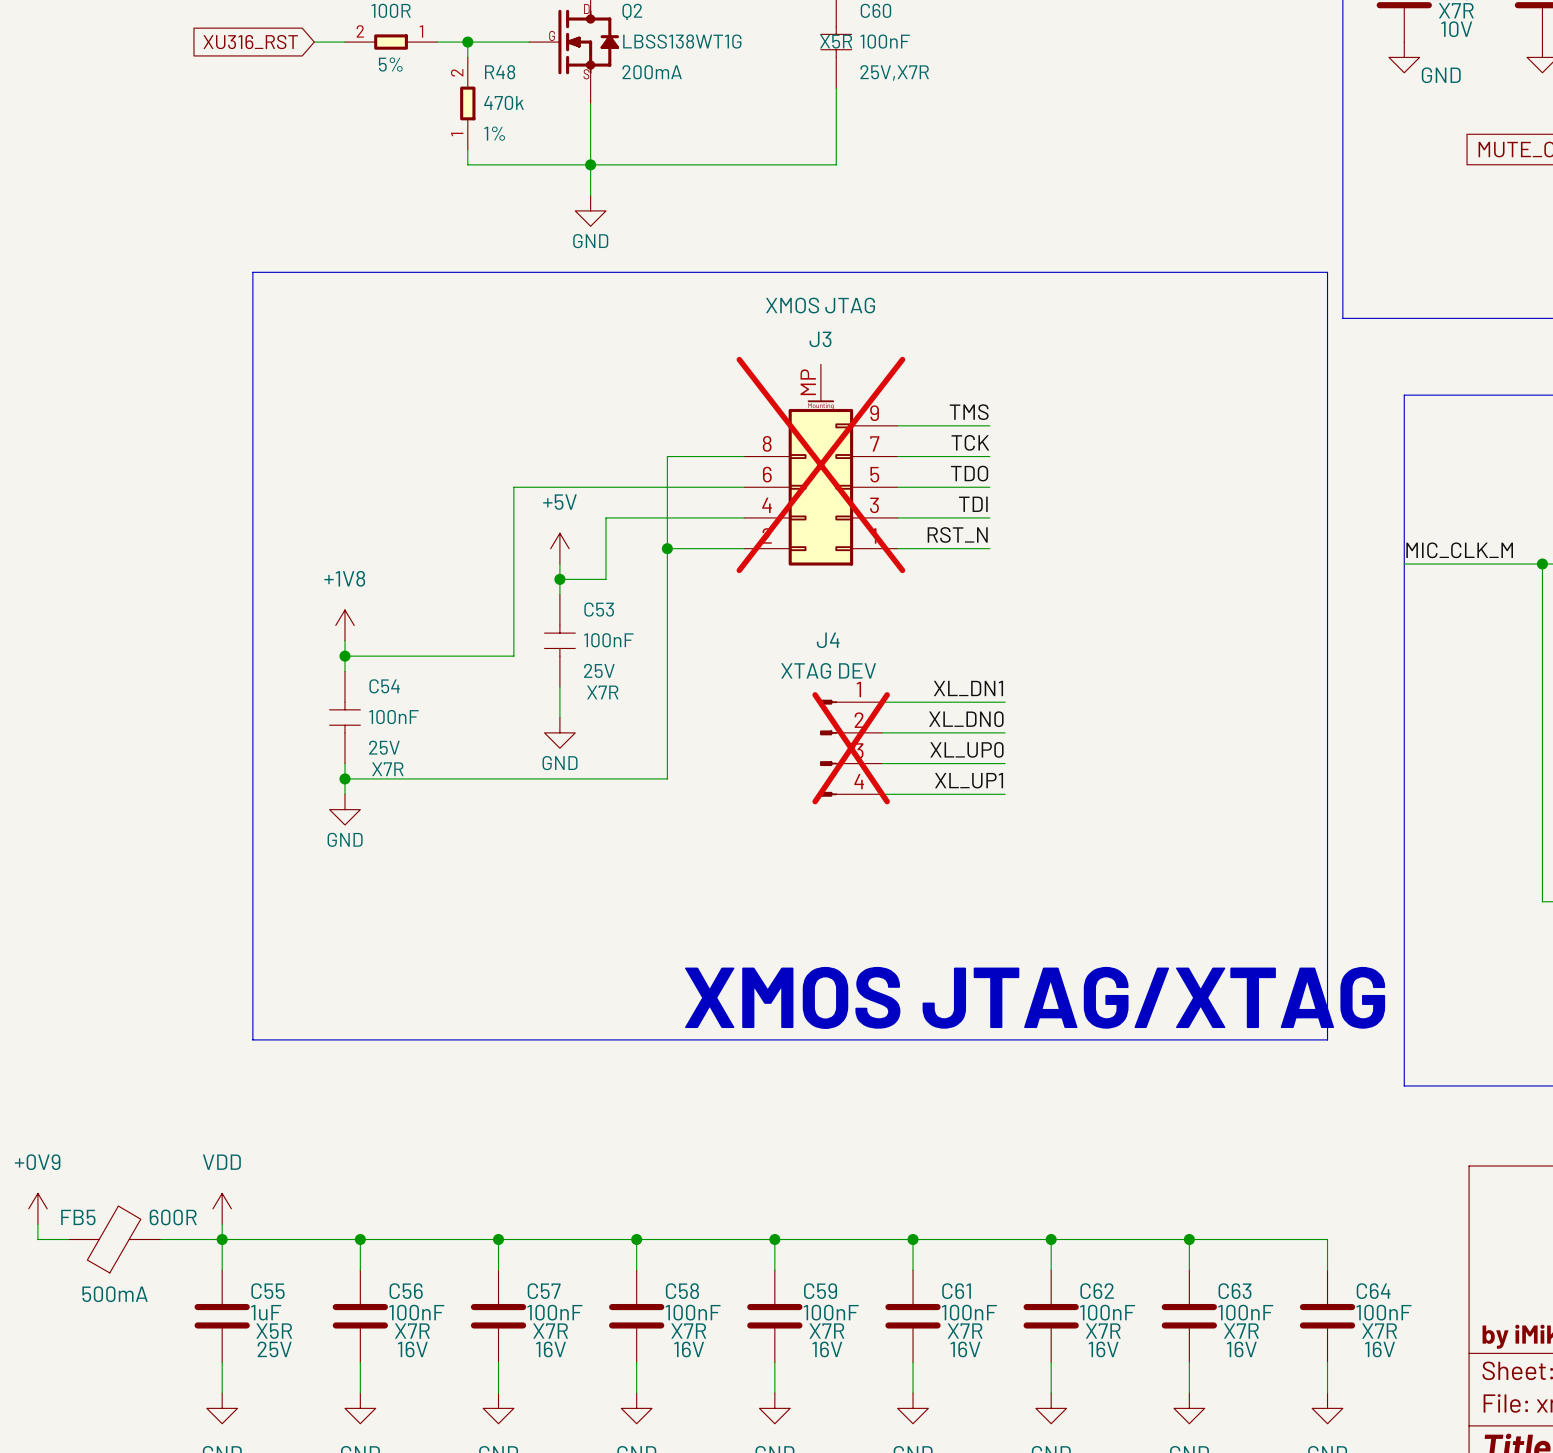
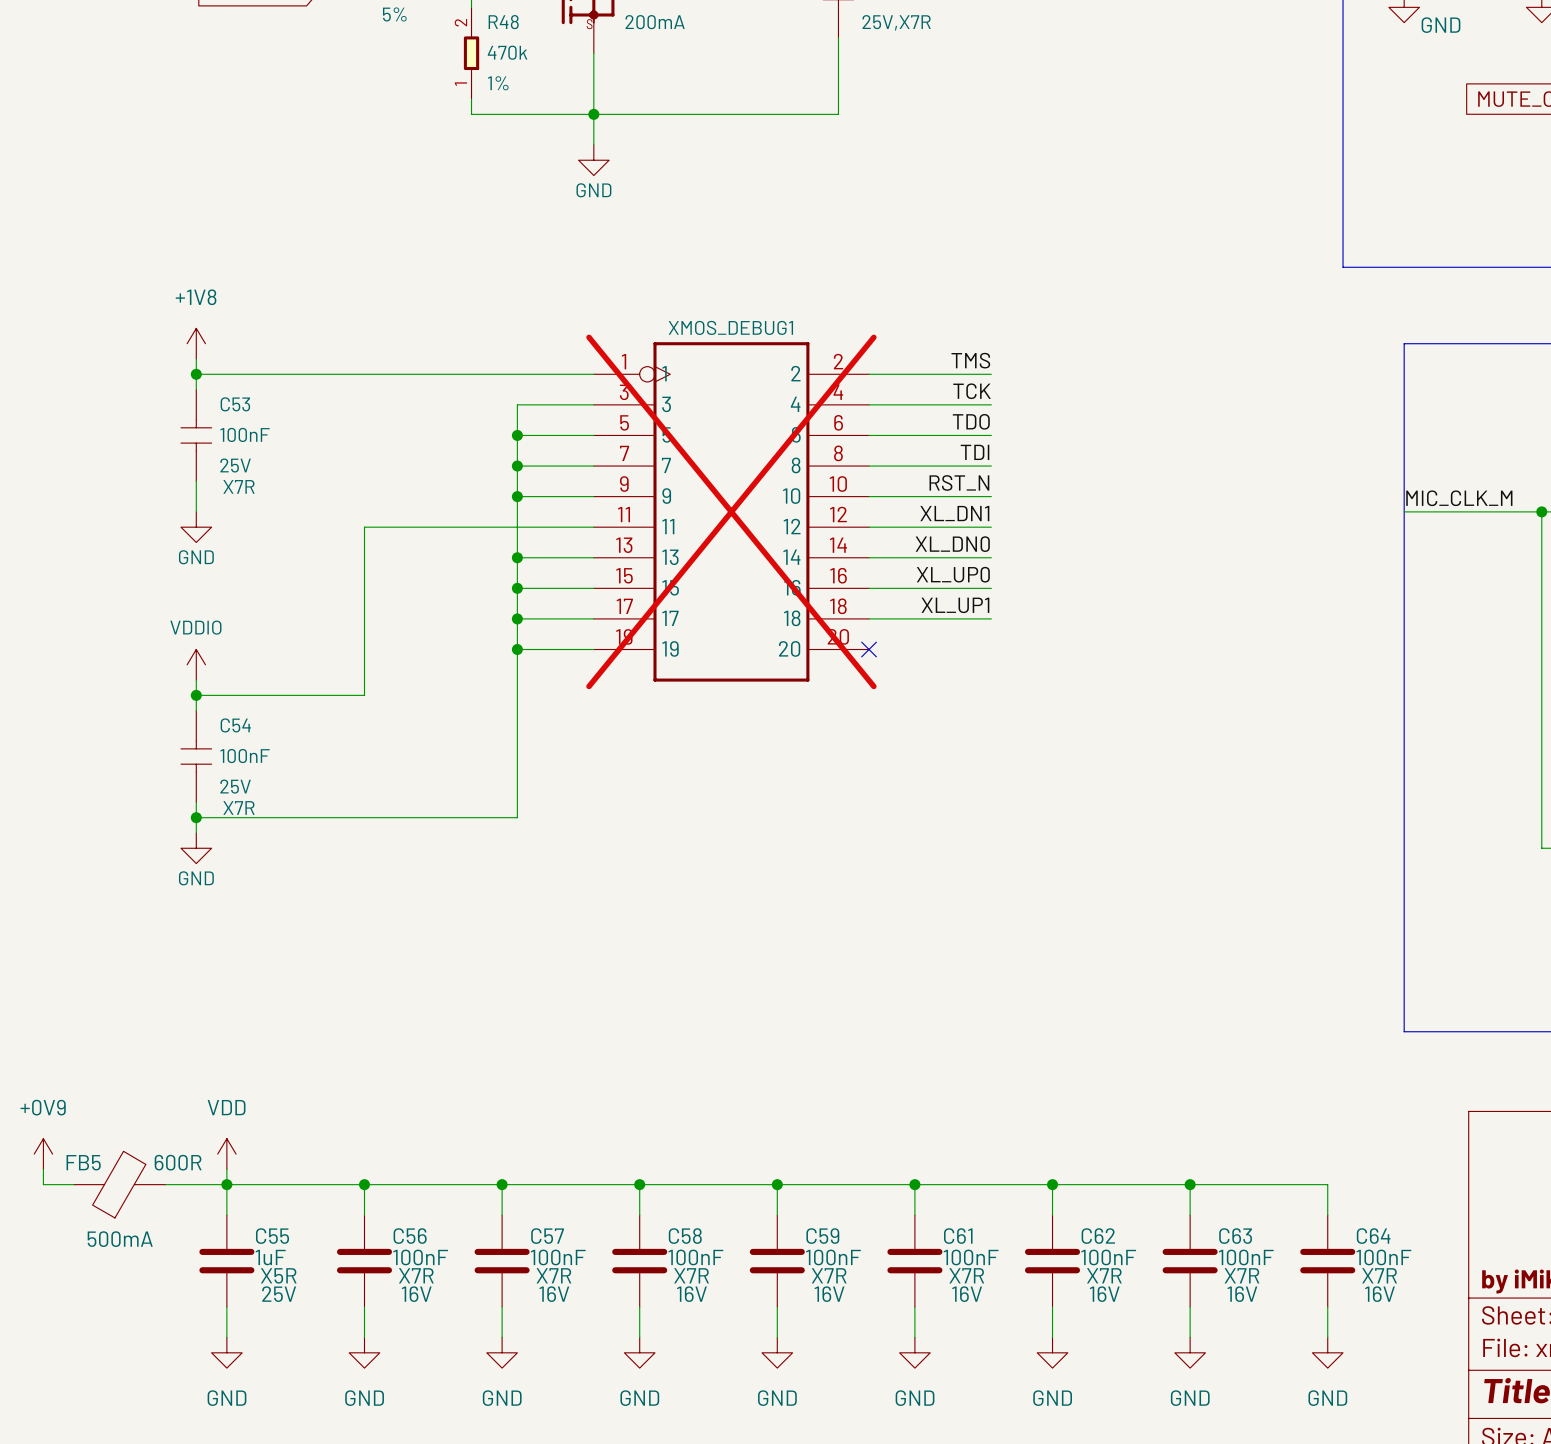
line: (252, 272) (1327, 272) (1327, 1039) (252, 1039) (252, 272) -> none
wire: none -> (196, 359) (196, 389)
wire: none -> (196, 374) (593, 374)
junction: none -> (196, 374)
wire: none -> (593, 404) (517, 404) (517, 435)
wire: (744, 456) (667, 456) (667, 778) (344, 778) -> none
J3: XMOS JTAG (820, 465) -> none
junction: none -> (517, 435)
wire: (590, 487) (744, 487) -> none
wire: none -> (517, 466) (593, 466)
junction: none -> (517, 466)
wire: (744, 517) (605, 517) (605, 579) (590, 579) -> none
wire: none -> (196, 481) (196, 511)
wire: none -> (517, 496) (593, 496)
junction: none -> (517, 496)
power symbol: +5V (559, 548) -> none
wire: (667, 548) (744, 548) -> (517, 588) (593, 588)
junction: (667, 548) -> none
wire: (559, 564) (559, 594) -> none
XMOS_DEBUG1: none -> (731, 511)
power symbol: none -> GND (196, 527)
wire: none -> (563, 527) (364, 527) (364, 695) (196, 695)
junction: (559, 579) -> none
wire: none -> (517, 557) (593, 557)
junction: none -> (517, 557)
power symbol position: +1V8 (344, 625) -> +1V8 (196, 343)
wire: (344, 640) (344, 671) -> (196, 680) (196, 710)
junction: none -> (517, 588)
C53 position: (559, 640) -> (196, 435)
wire: (344, 656) (513, 656) -> (196, 817) (517, 817) (517, 603)
junction: (344, 656) -> none
wire: none -> (517, 618) (593, 618)
junction: none -> (517, 618)
wire: (559, 686) (559, 717) -> none
label position: XL_DN1 (968, 688) -> XL_DN1 (954, 513)
wire: none -> (517, 649) (593, 649)
junction: none -> (517, 649)
no-connect mark: none -> (869, 649)
wire: (882, 702) (1005, 702) -> (869, 527) (991, 527)
power symbol: none -> VDDIO (196, 664)
C54 position: (344, 717) -> (196, 756)
label position: XL_DN0 (966, 719) -> XL_DN0 (952, 544)
power symbol: GND (559, 732) -> none
wire: (882, 732) (1005, 732) -> (869, 557) (991, 557)
junction: none -> (196, 695)
J4: XTAG DEV (851, 748) -> none
label position: XL_UP0 (966, 749) -> XL_UP0 (953, 574)
wire: (344, 763) (344, 794) -> (196, 802) (196, 832)
wire: (882, 763) (1005, 763) -> (869, 588) (991, 588)
junction: (344, 778) -> none
label position: XL_UP1 (969, 780) -> XL_UP1 (955, 605)
wire: (882, 794) (1005, 794) -> (869, 618) (991, 618)
power symbol: GND (344, 809) -> none
junction: none -> (196, 817)
power symbol: none -> GND (196, 848)
text: XMOS JTAG/XTAG (1035, 997) -> none

